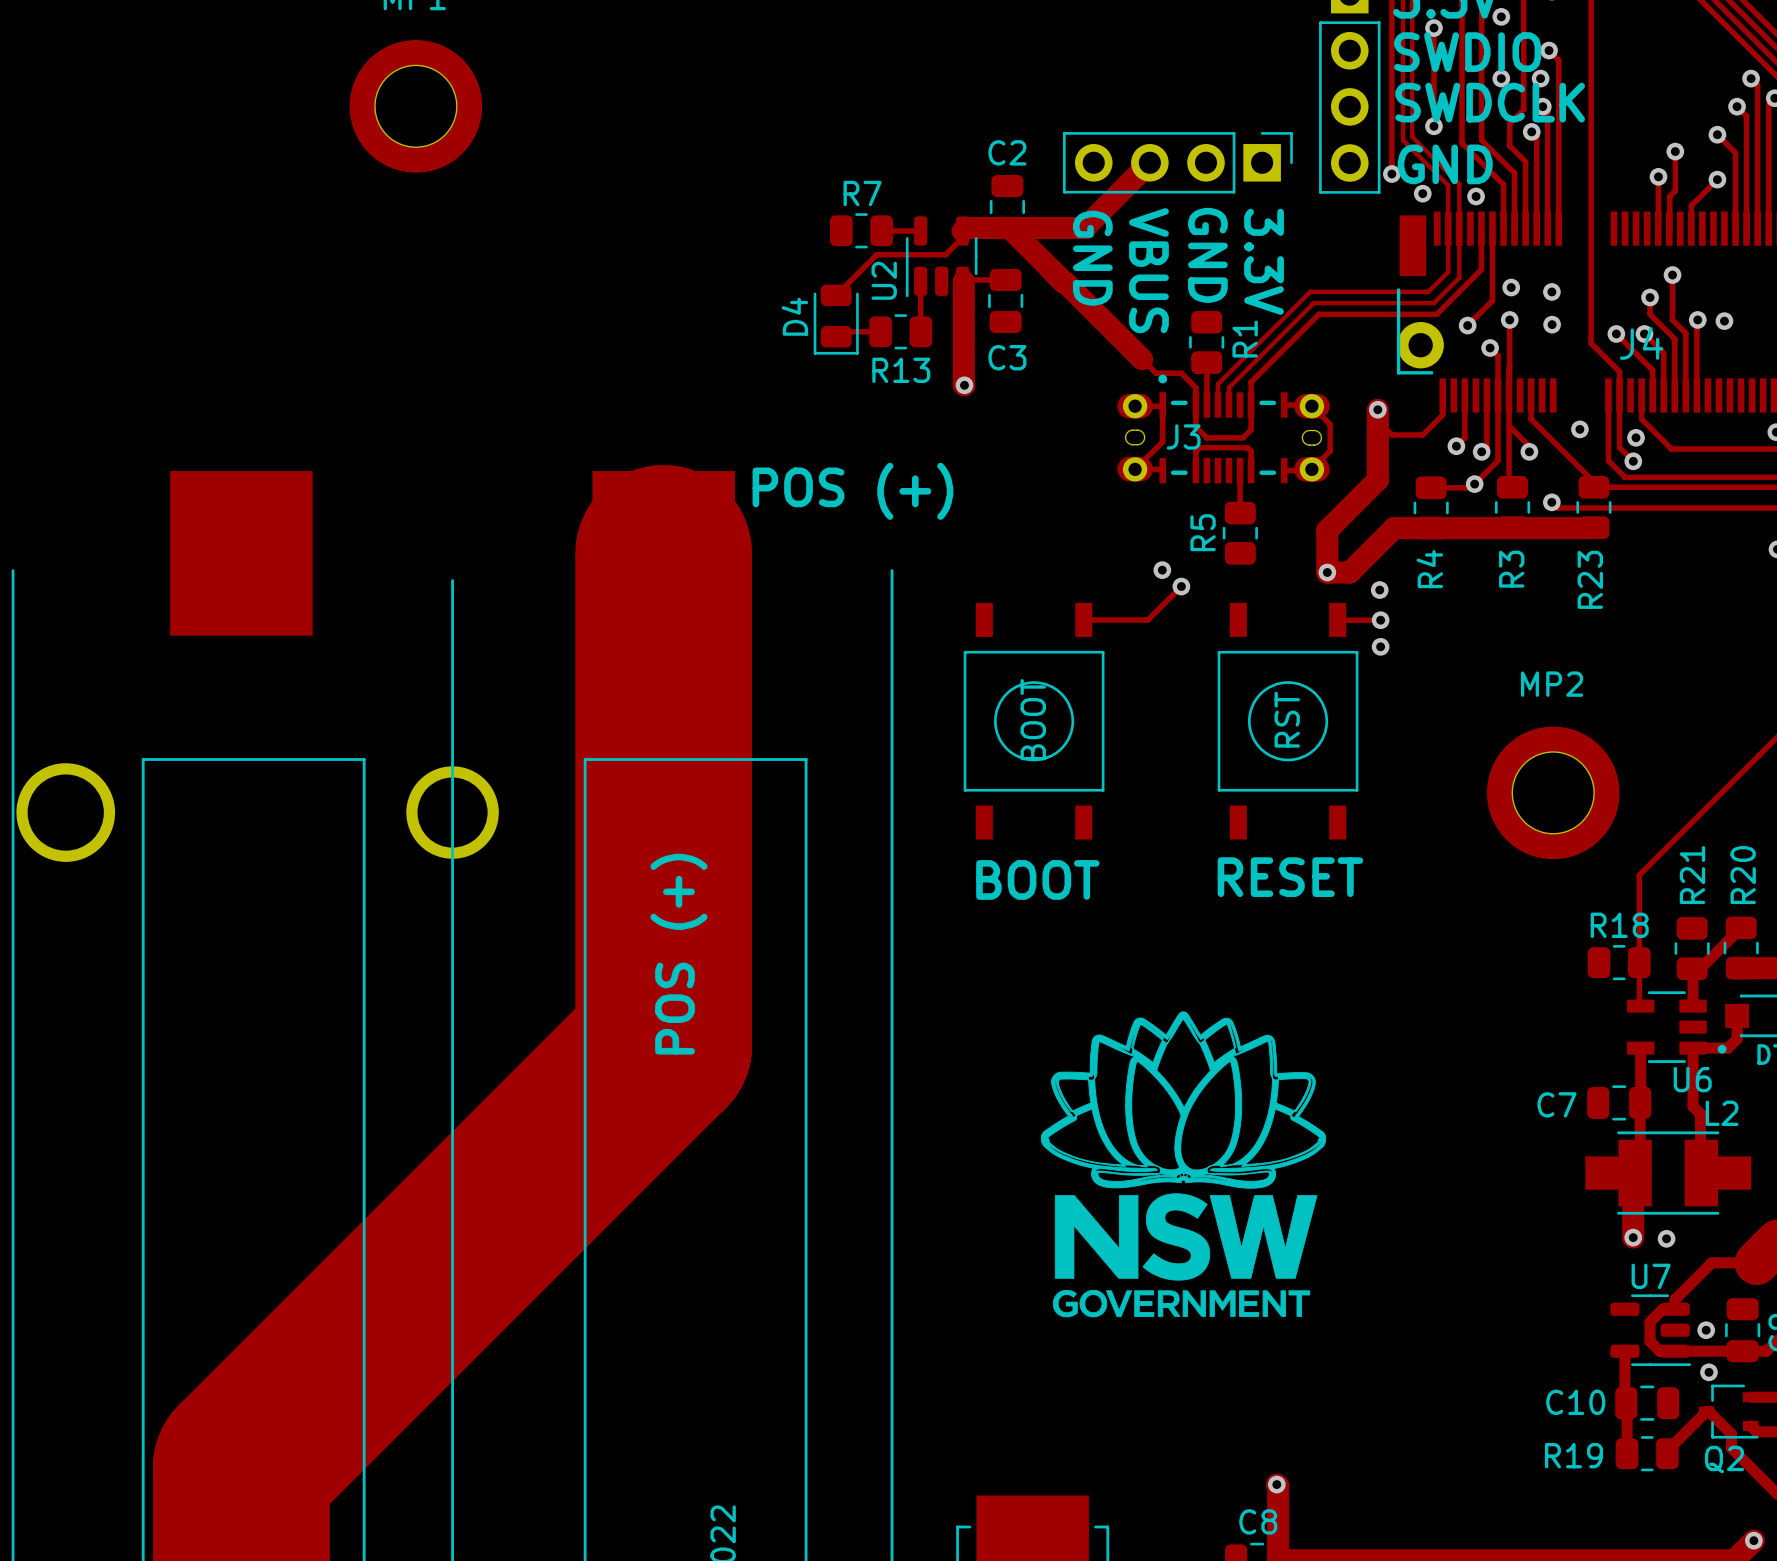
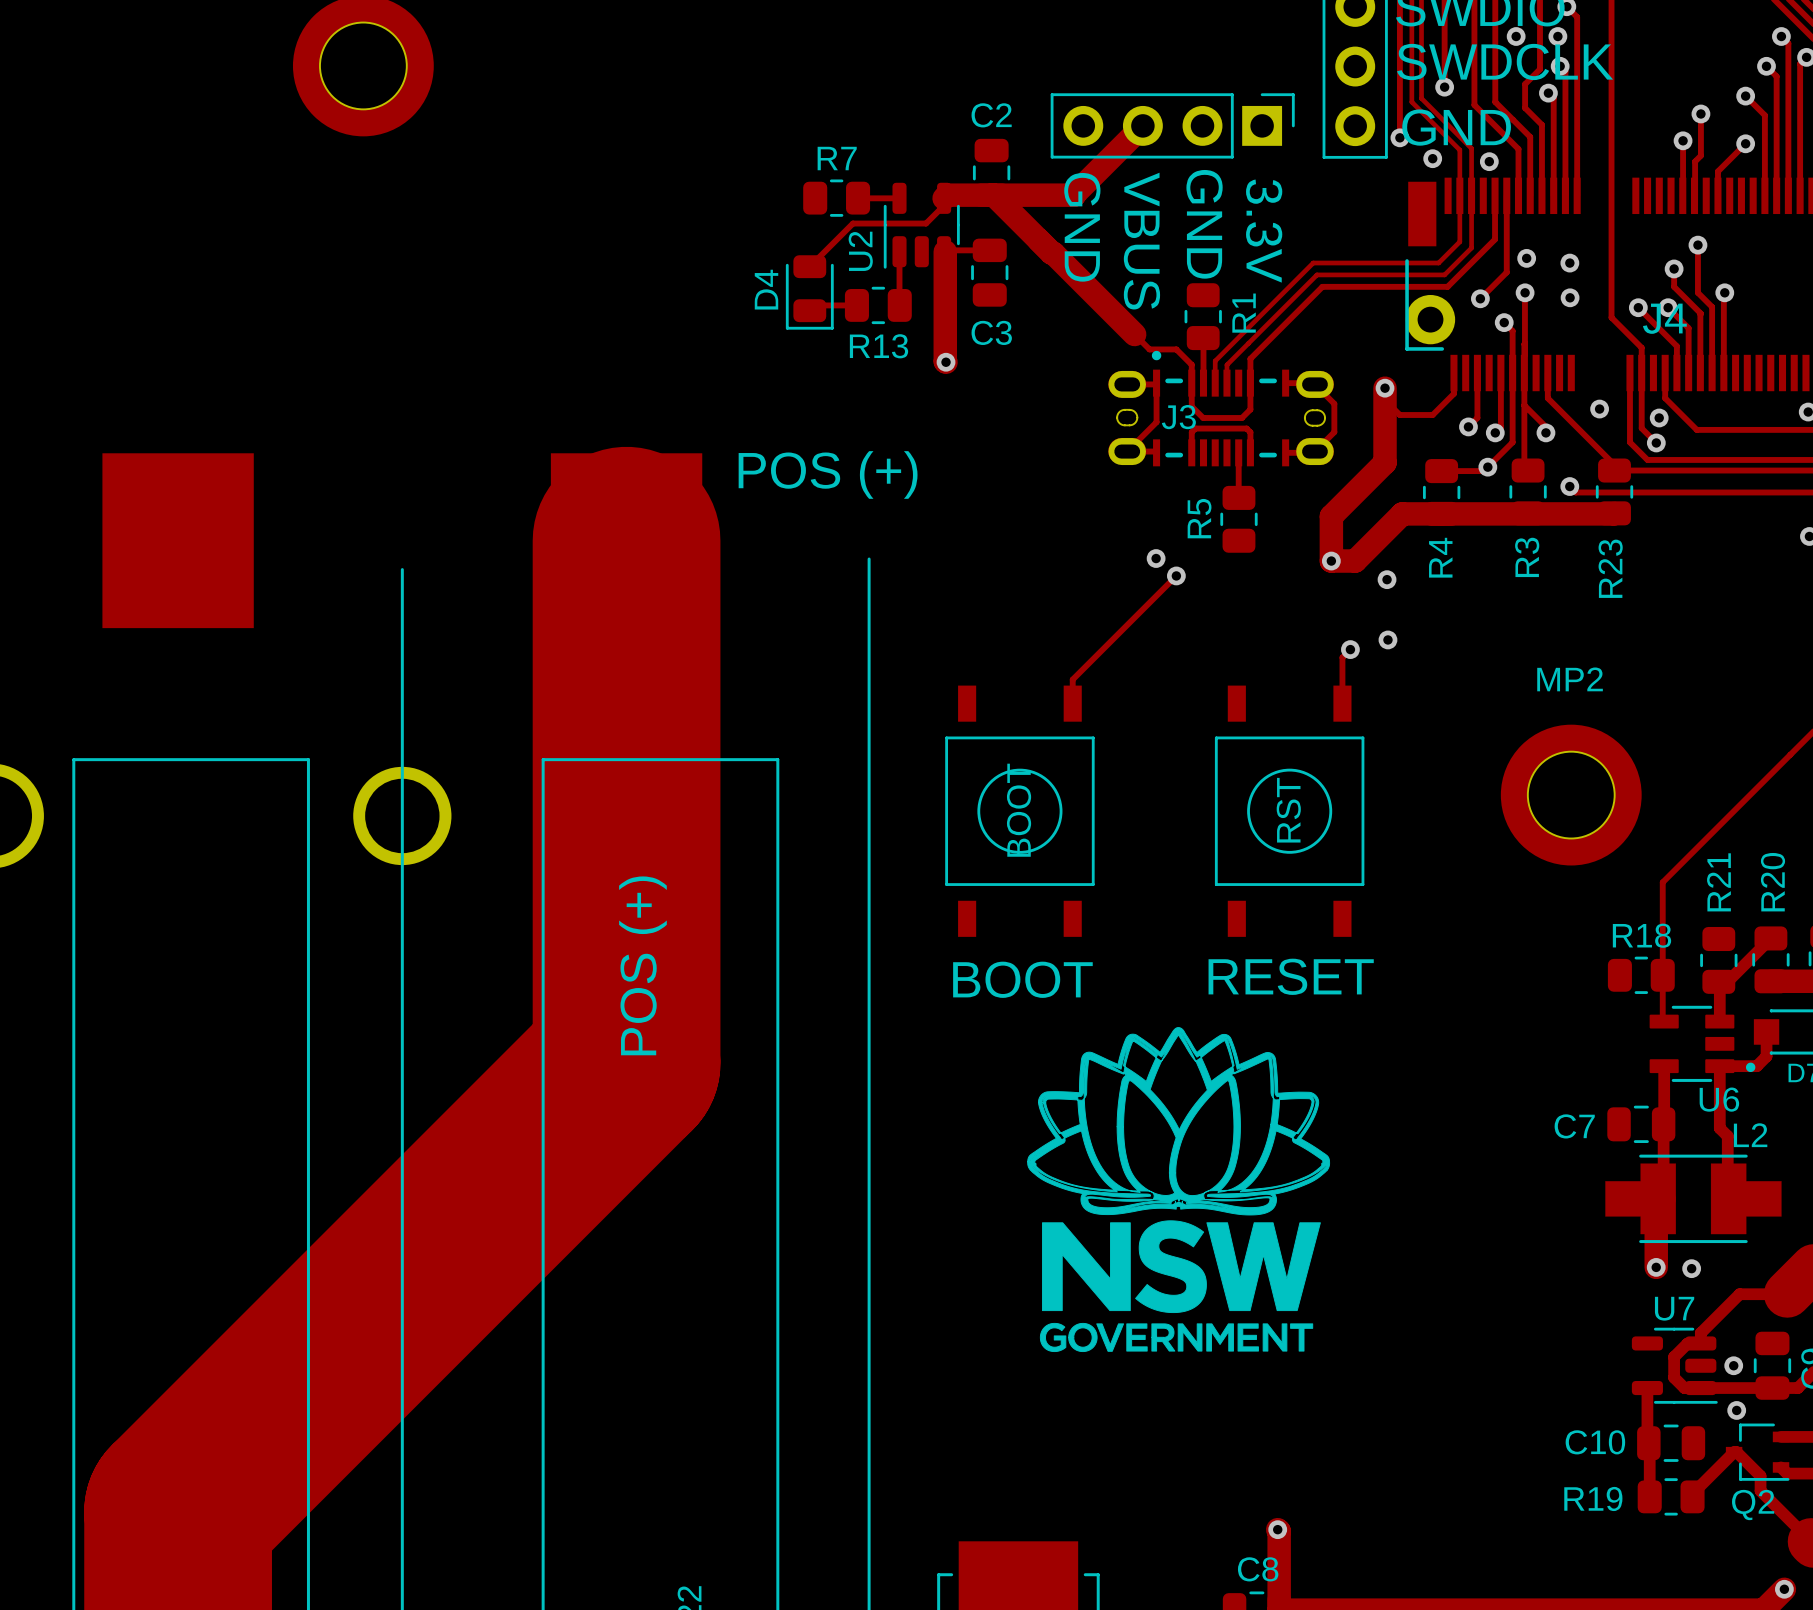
via: (1724, 321) -> none
J3 footprint: [1117, 374, 1330, 484] -> [1108, 350, 1334, 467]
track: (1083, 619) (1148, 619) -> (1072, 703) (1072, 679) (1140, 611)
track: (1338, 620) (1380, 620) -> none
via position: (1380, 620) -> (1350, 649)
track: none -> (1350, 649) (1342, 657) (1342, 703)
part position: (1034, 721) -> (1019, 811)
part position: (1288, 721) -> (1289, 811)
text position: RESET (1290, 877) -> RESET (1291, 976)
text position: BOOT (1037, 879) -> BOOT (1022, 979)

